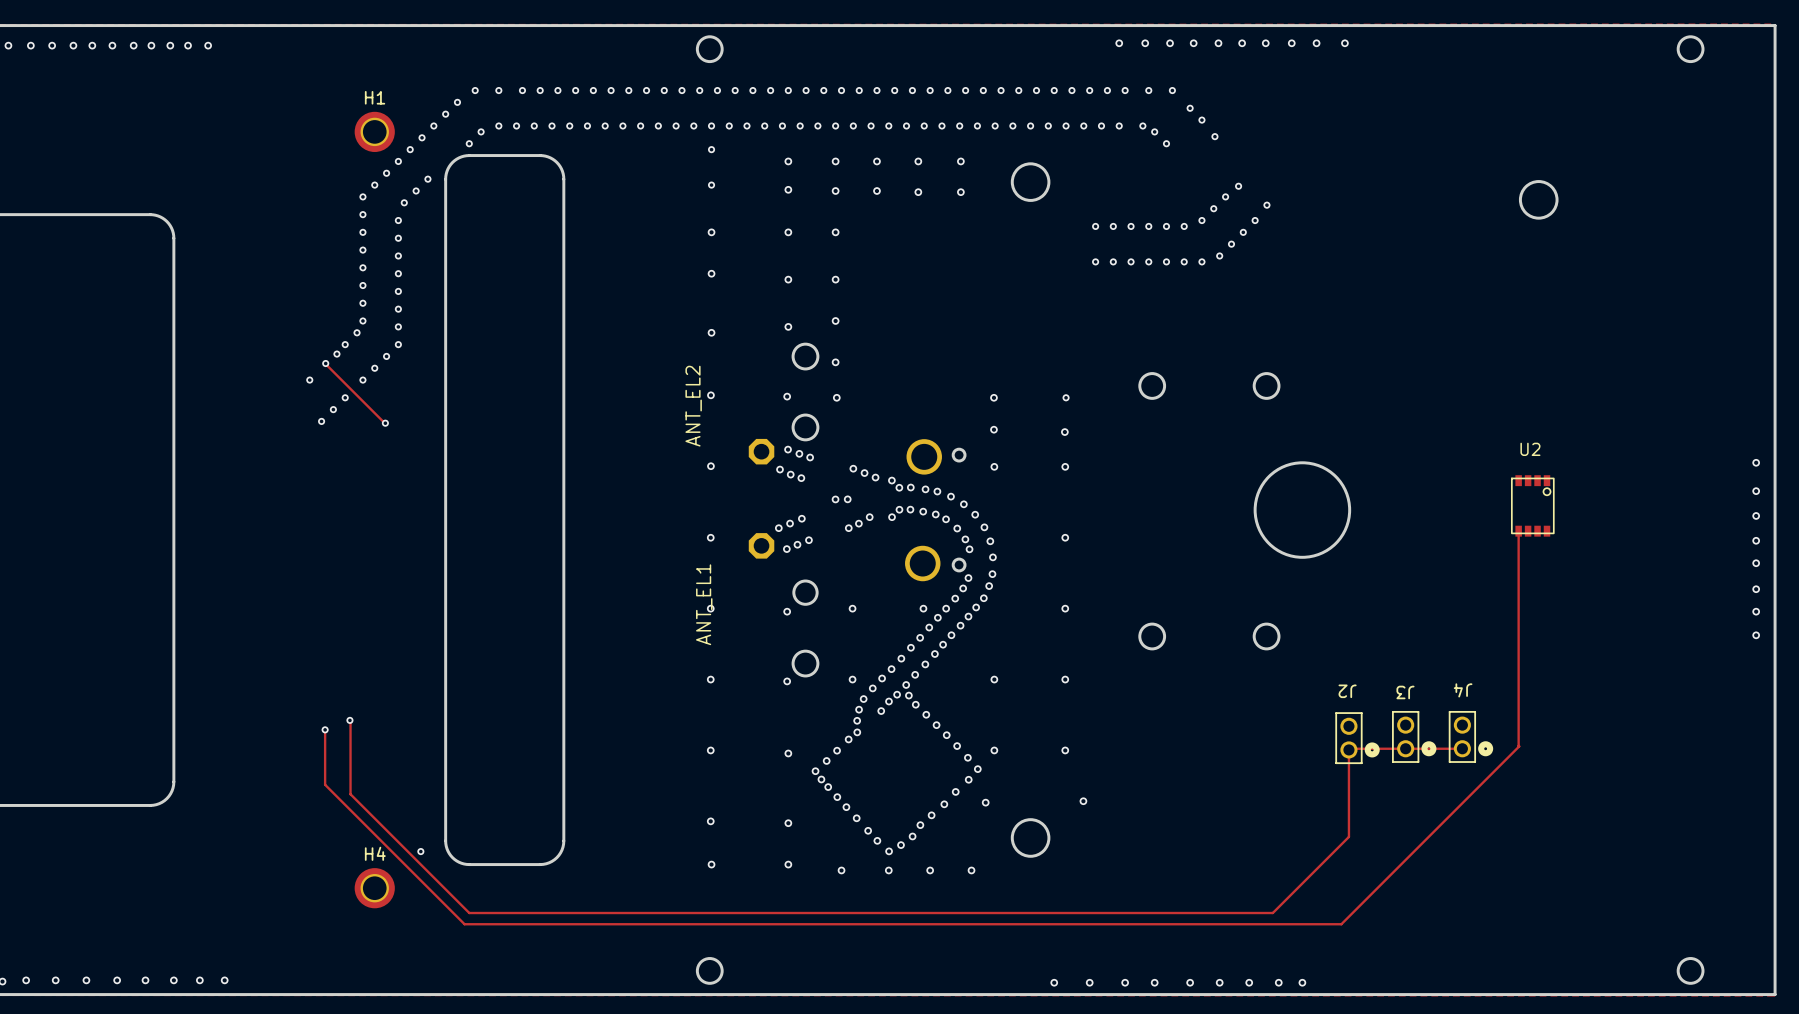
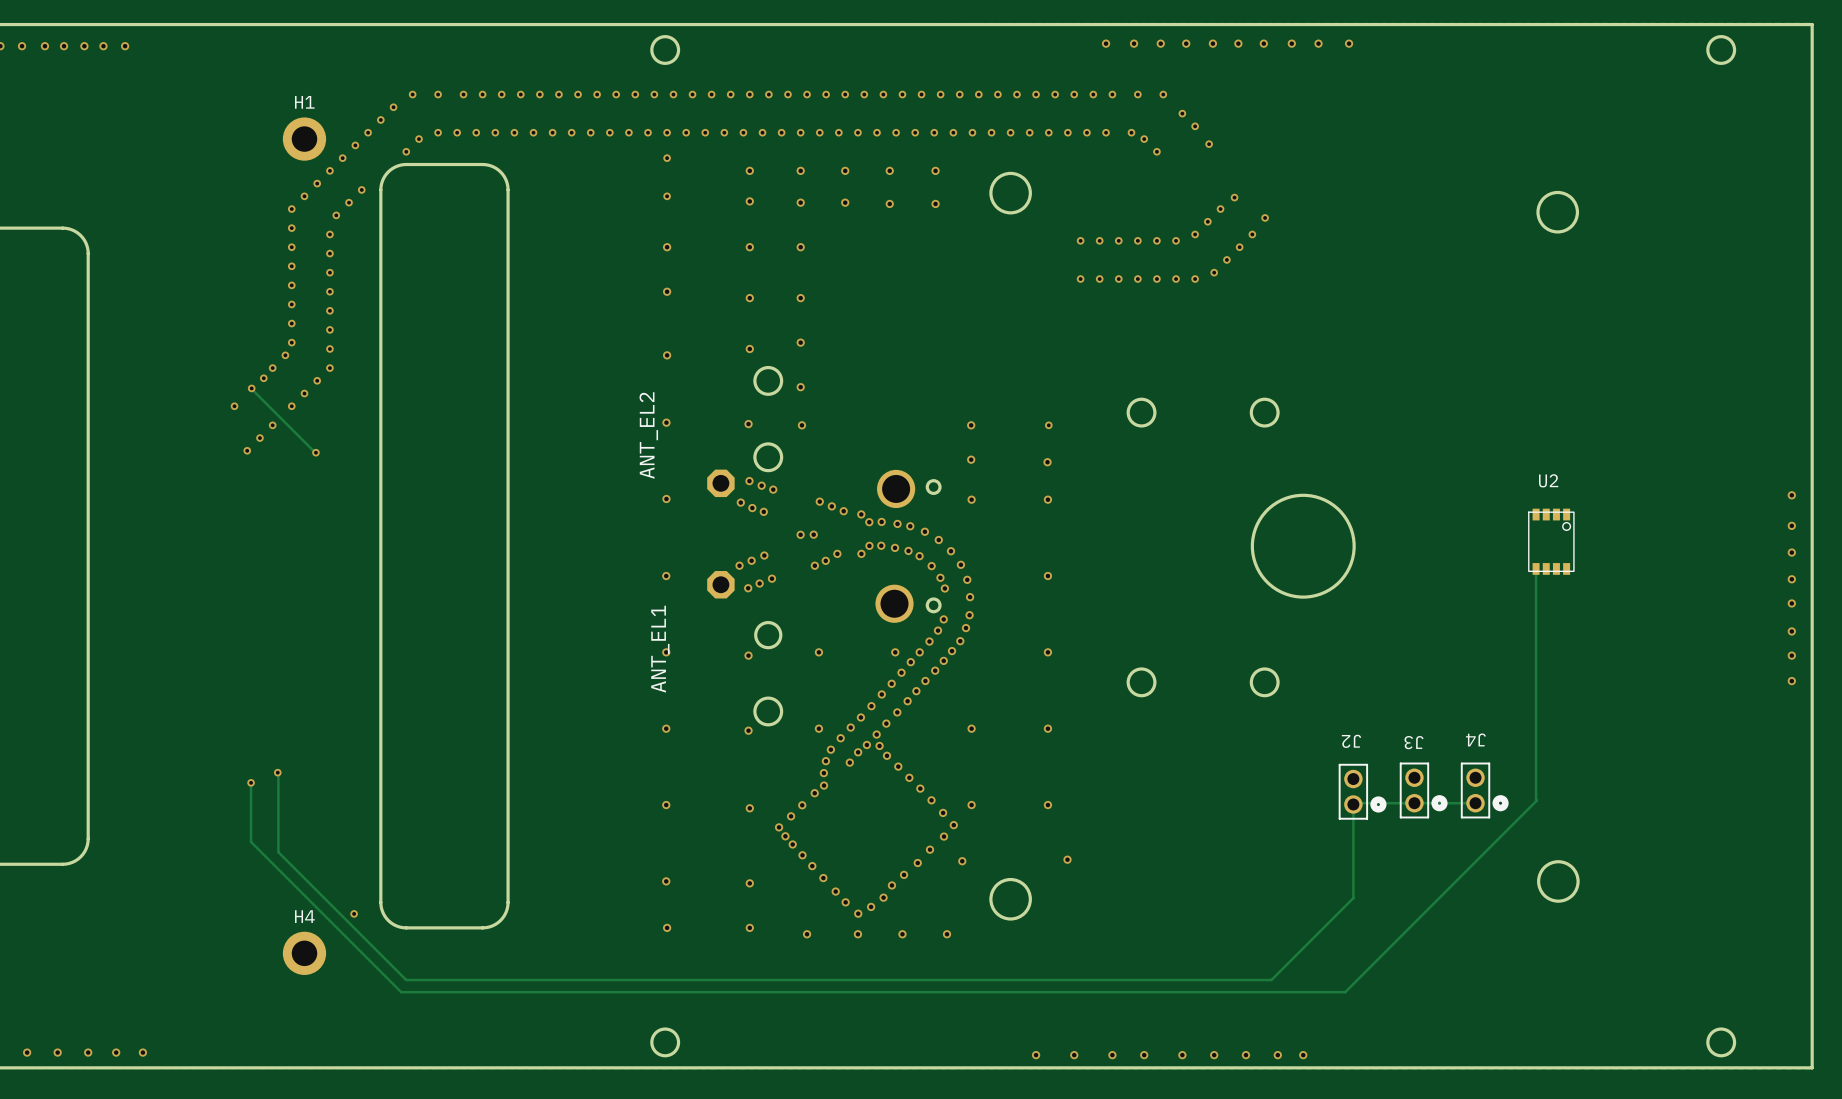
round board edge: none -> [1537, 860, 1580, 903]

